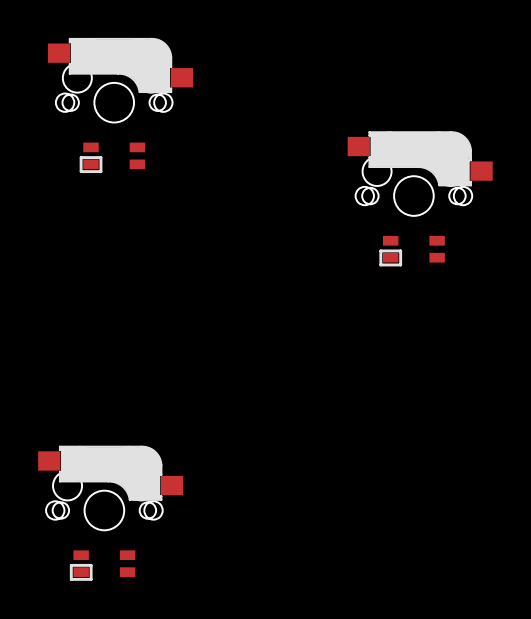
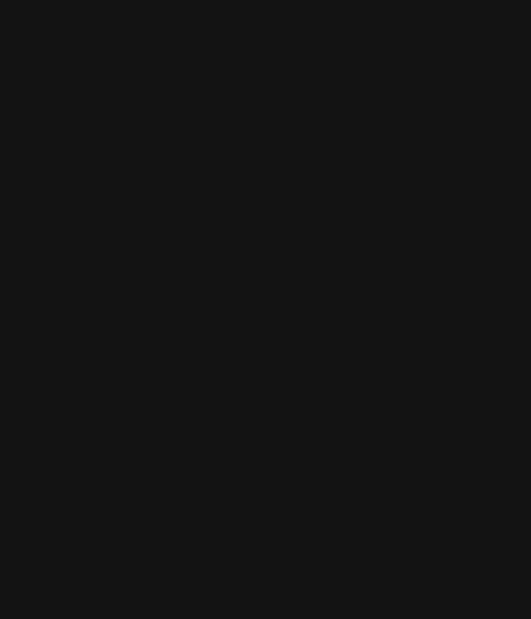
part: (120, 105) -> none
part: (420, 198) -> none
part: (110, 513) -> none

